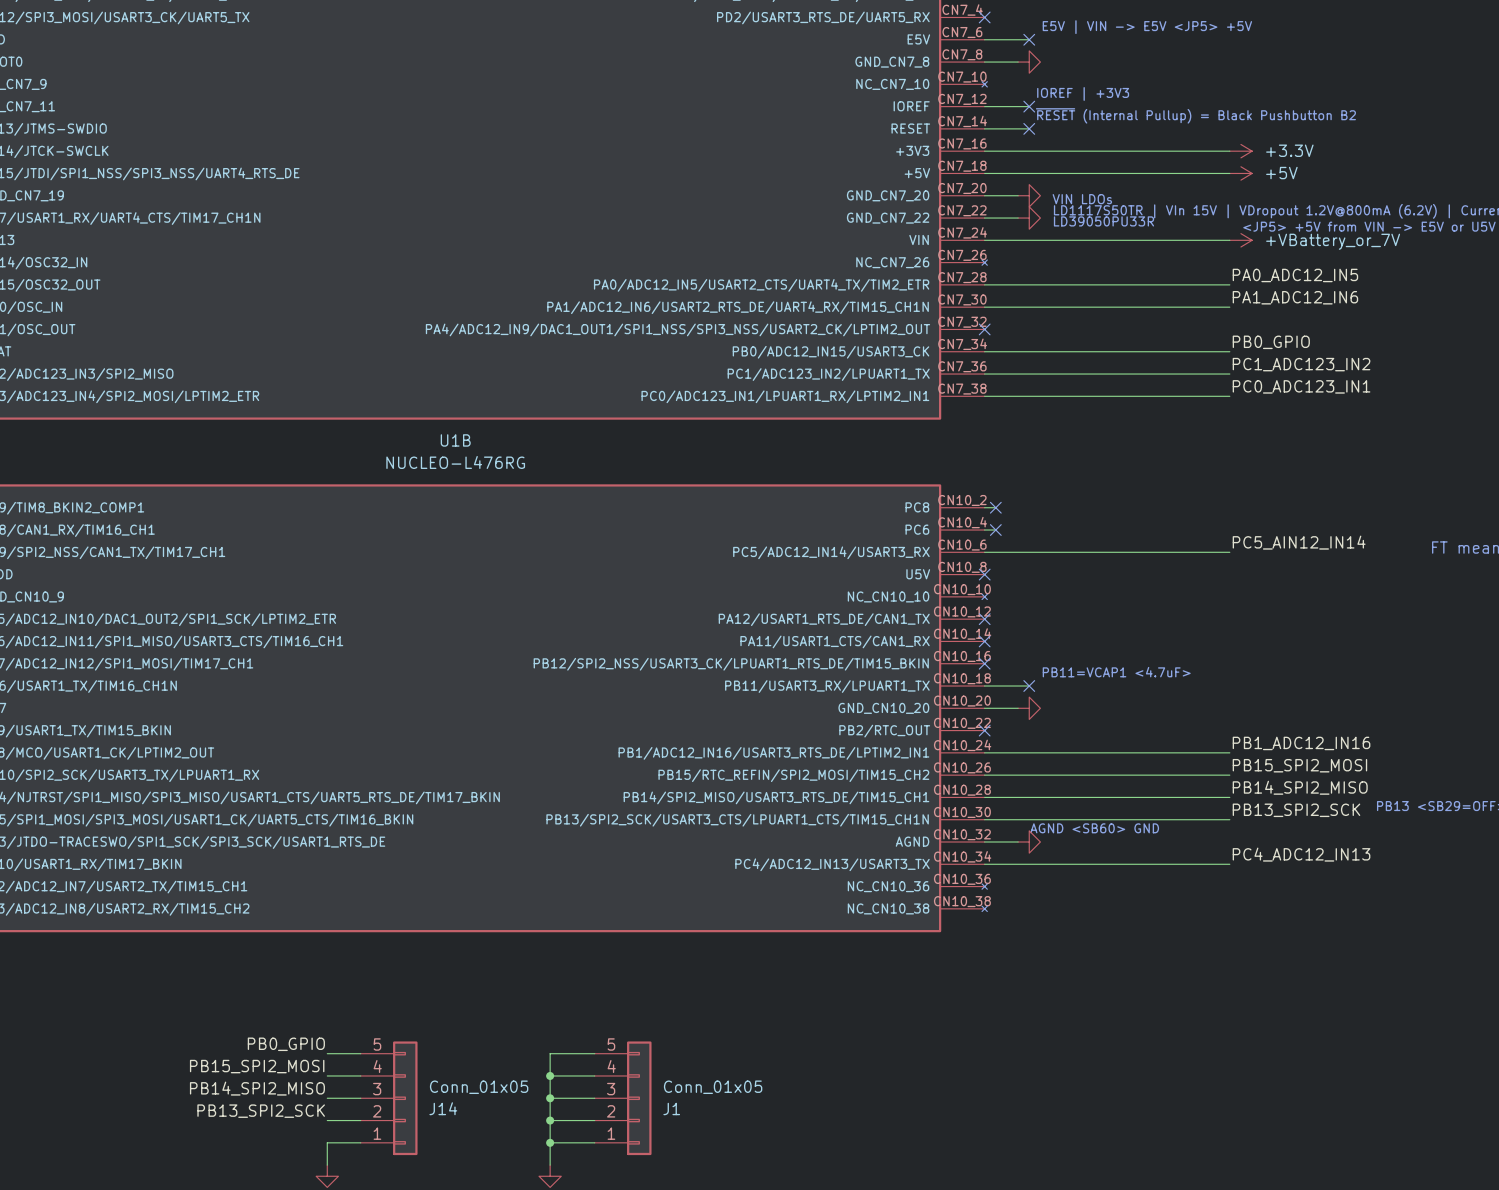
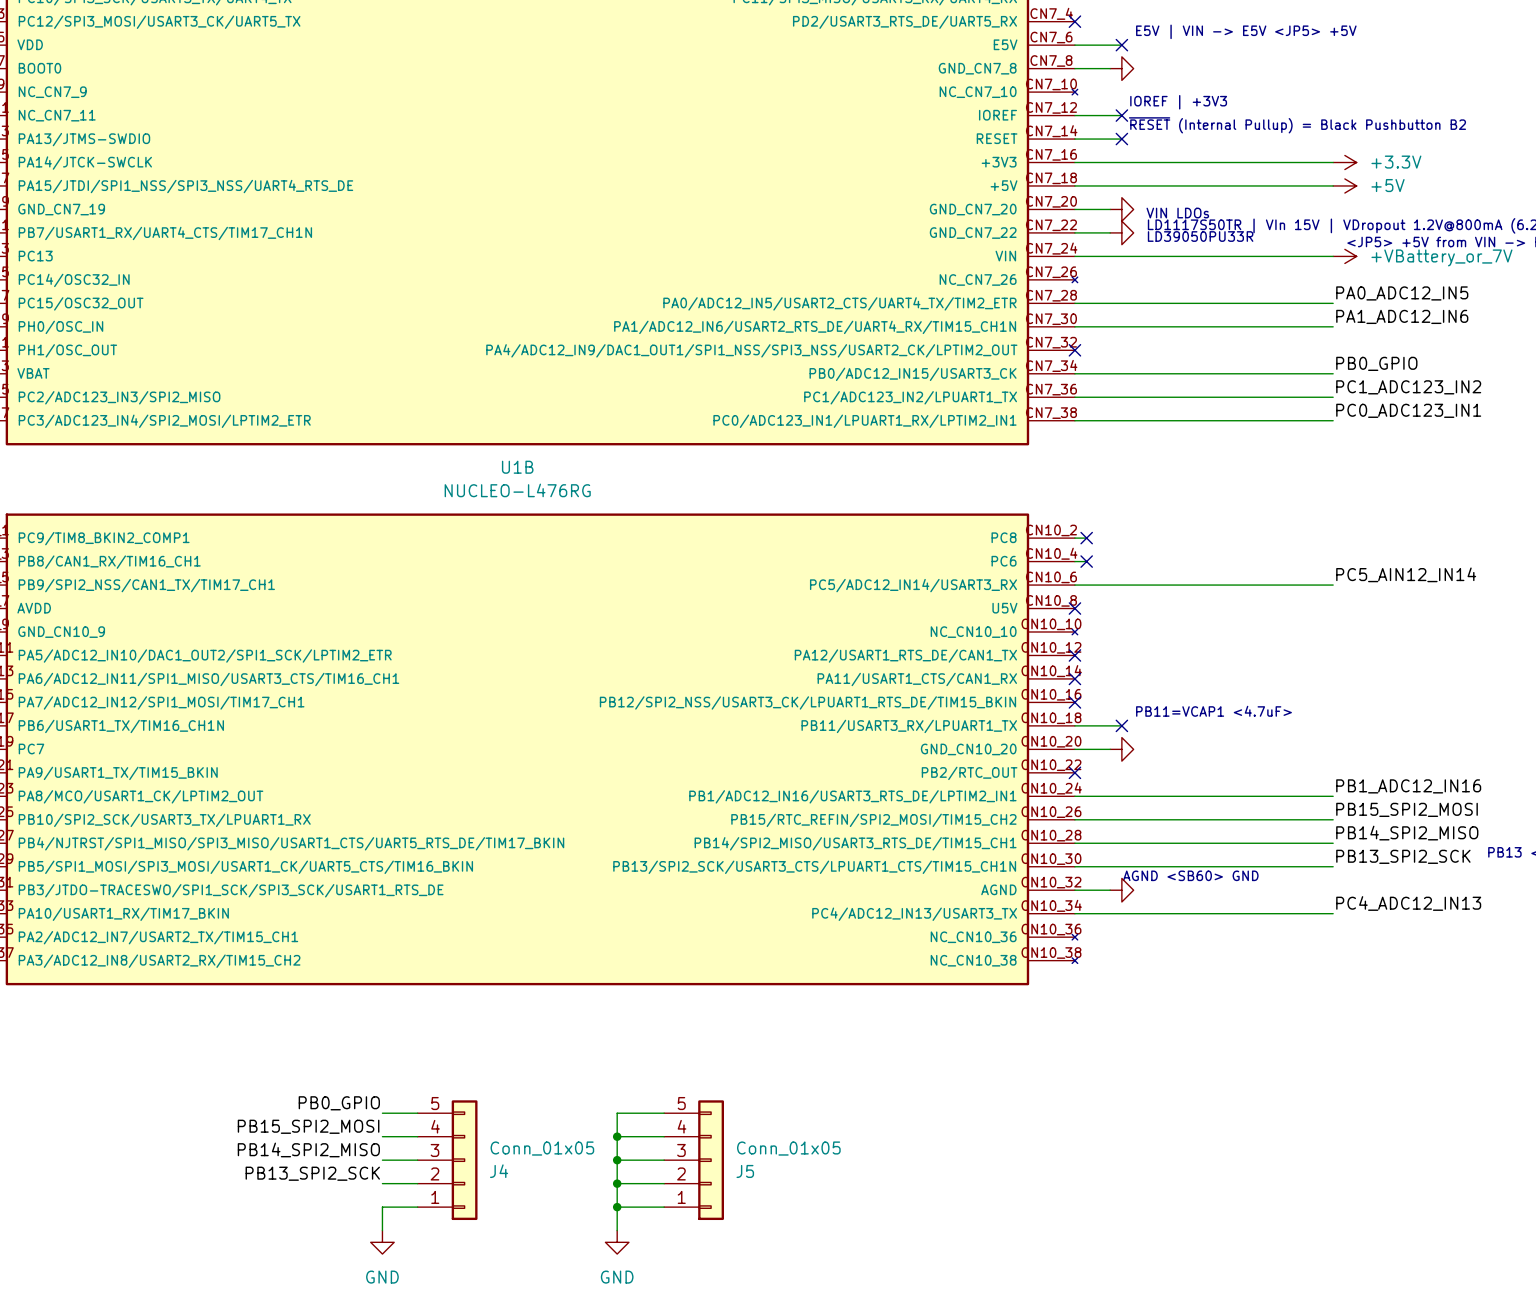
J14 name: J14 (443, 1108) -> J4 (499, 1171)
J1 name: J1 (671, 1108) -> J5 (745, 1171)

